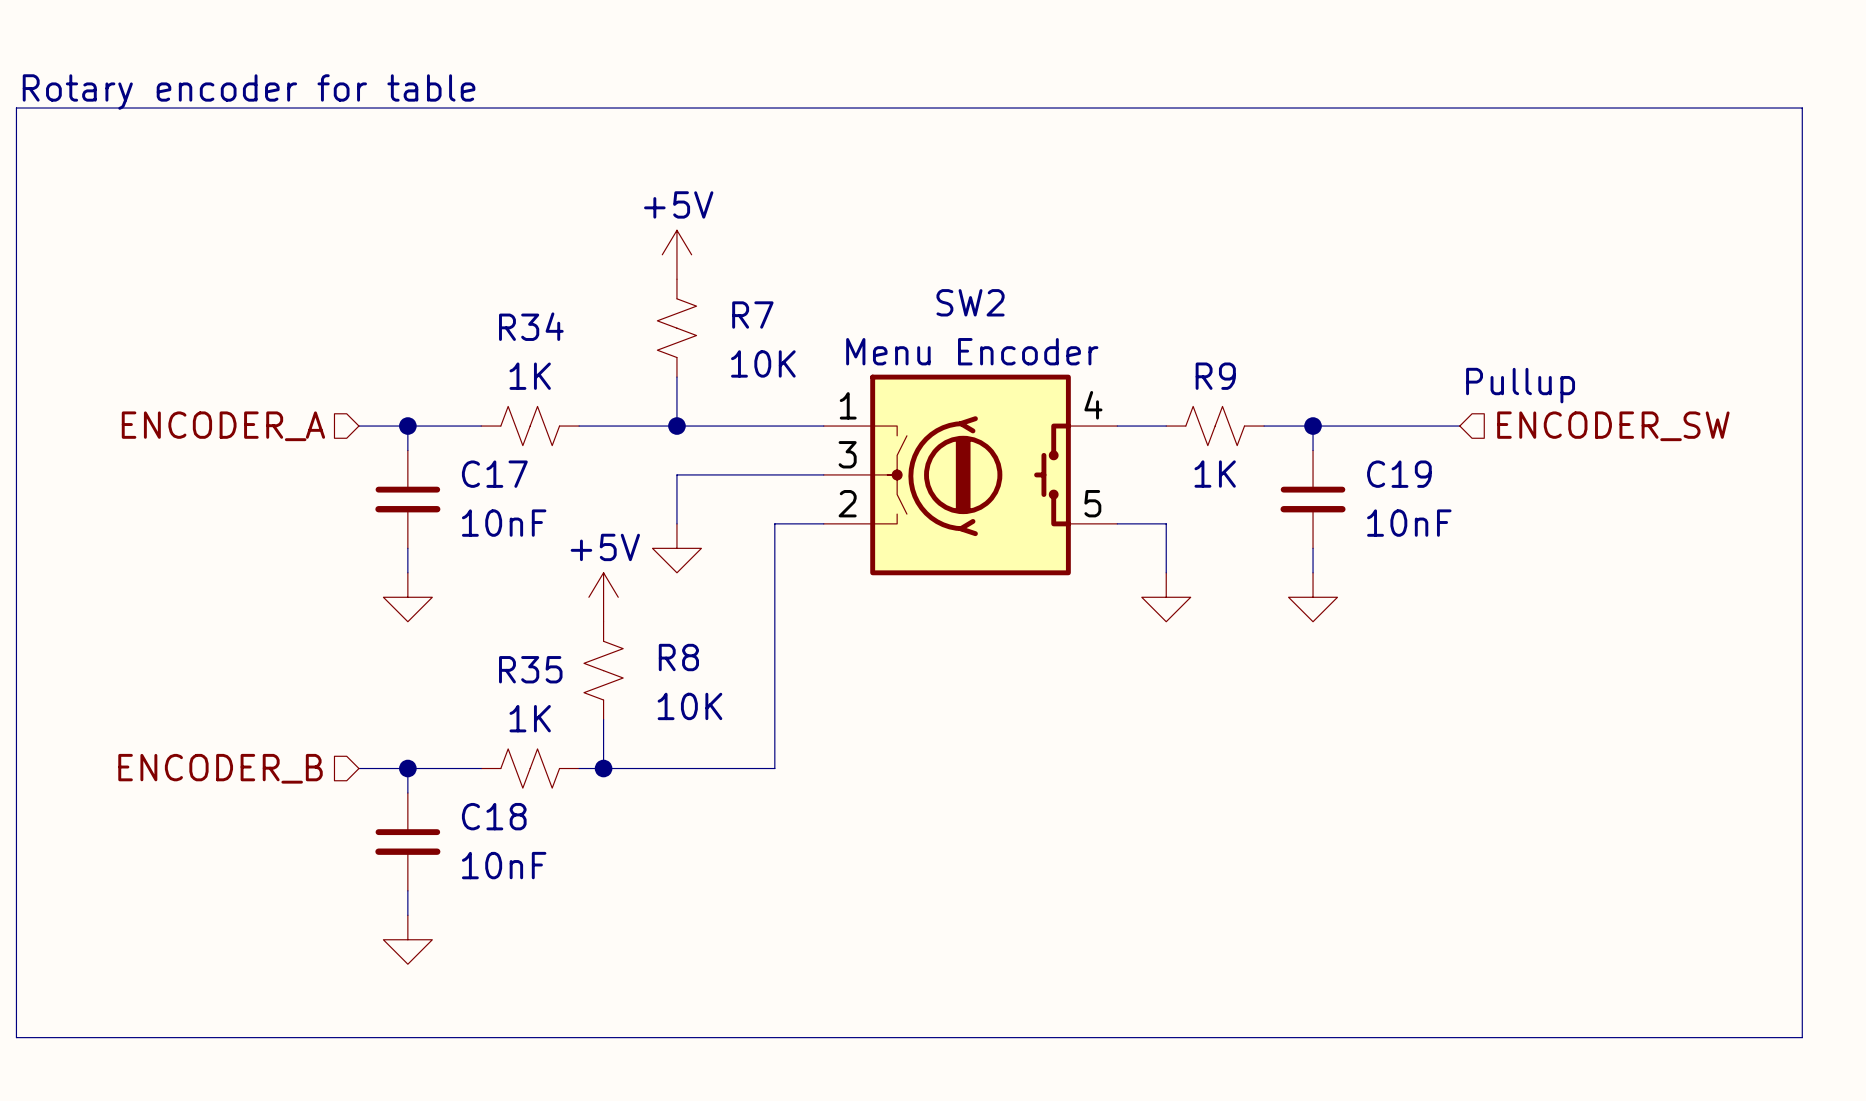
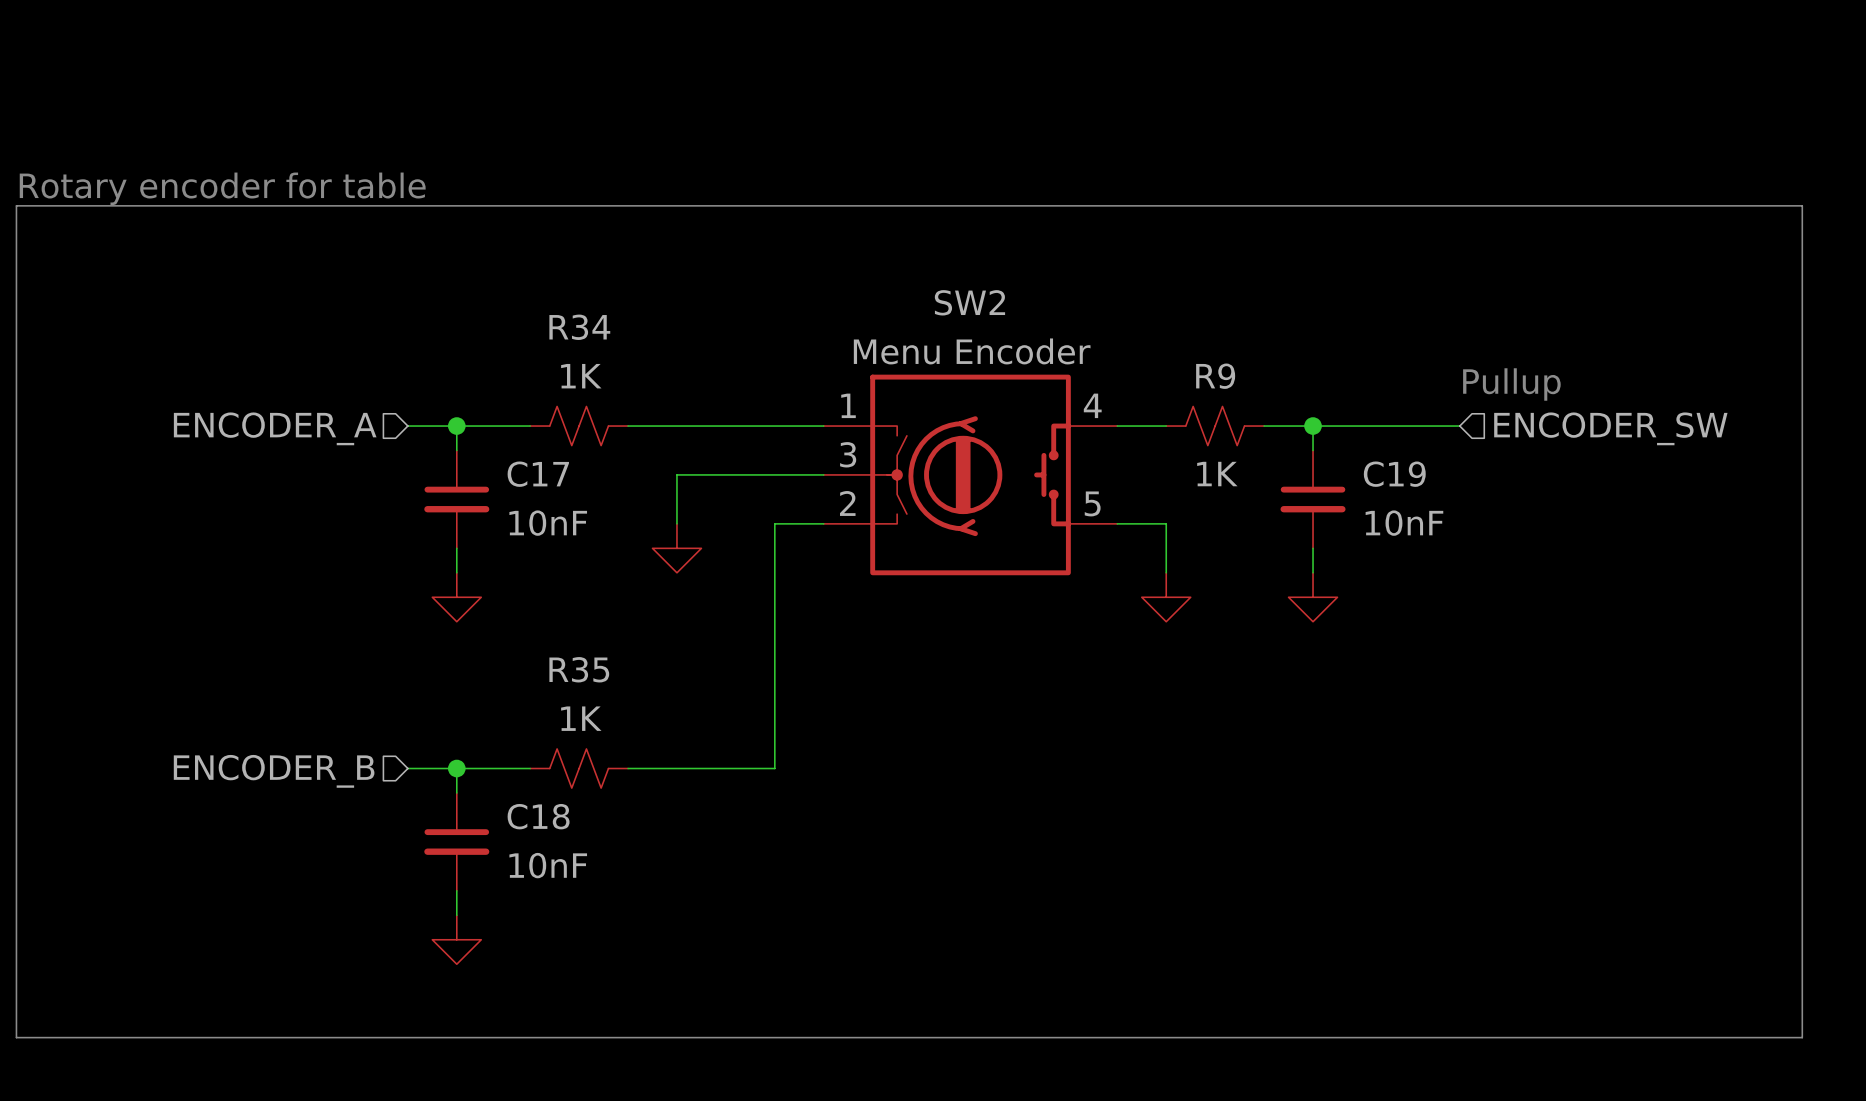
text position: Rotary encoder for table (249, 92) -> Rotary encoder for table (222, 188)
line: (16, 205) (16, 108) (1802, 108) (1802, 205) -> (16, 205) (1802, 205)
power symbol: +5V (676, 254) -> none
R7: 10K (676, 328) -> none
wire: (676, 377) (676, 426) -> none
hierarchical label position: ENCODER_A (223, 426) -> ENCODER_A (275, 428)
wire: (358, 426) (407, 426) (407, 450) -> none
junction position: (407, 426) -> (456, 426)
wire: none -> (456, 426) (456, 450)
R34 position: (530, 426) -> (579, 426)
wire: (579, 426) (628, 426) -> (481, 426) (530, 426)
junction: (676, 426) -> none
C17 position: (407, 499) -> (456, 499)
wire: (407, 548) (407, 572) -> (456, 548) (456, 572)
power symbol position: (407, 597) -> (456, 597)
power symbol: +5V (603, 597) -> none
R8: 10K (603, 670) -> none
wire: (603, 719) (603, 768) -> none
hierarchical label position: ENCODER_B (220, 768) -> ENCODER_B (274, 771)
wire: (358, 768) (407, 768) (407, 792) -> none
junction position: (407, 768) -> (456, 768)
wire: none -> (456, 768) (456, 792)
R35 position: (530, 768) -> (579, 768)
wire: (579, 768) (628, 768) -> (481, 768) (530, 768)
junction: (603, 768) -> none
C18 position: (407, 841) -> (456, 841)
wire: (407, 890) (407, 915) -> (456, 890) (456, 915)
power symbol position: (407, 939) -> (456, 939)

